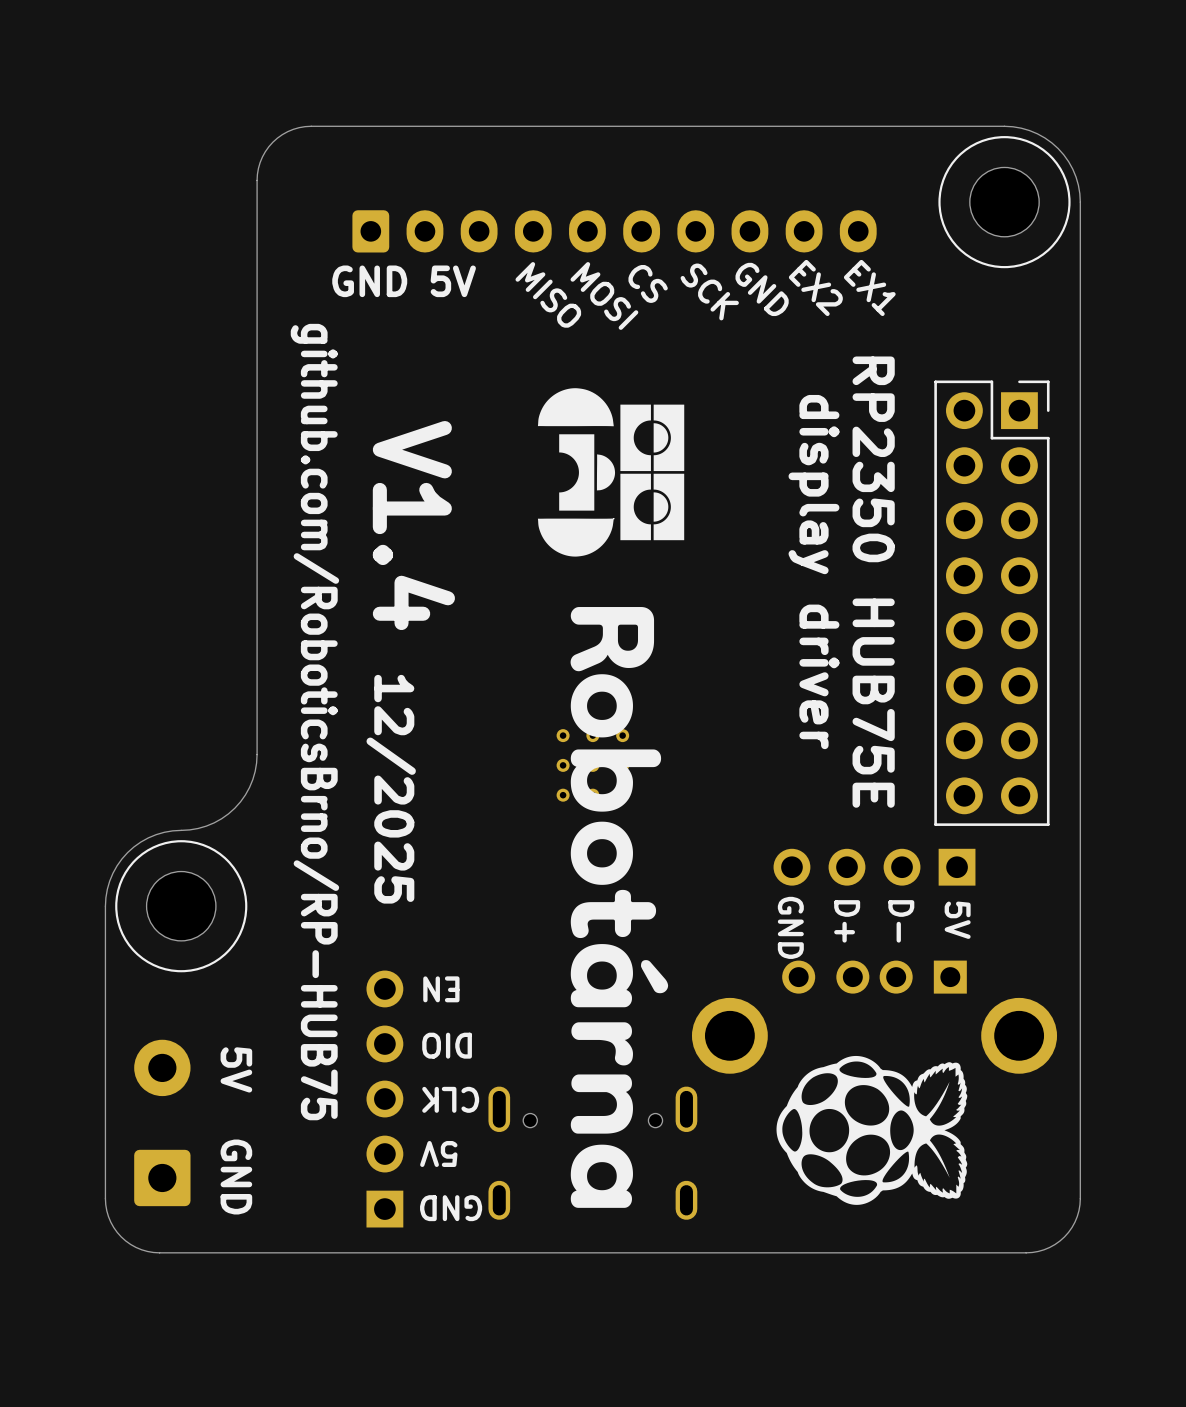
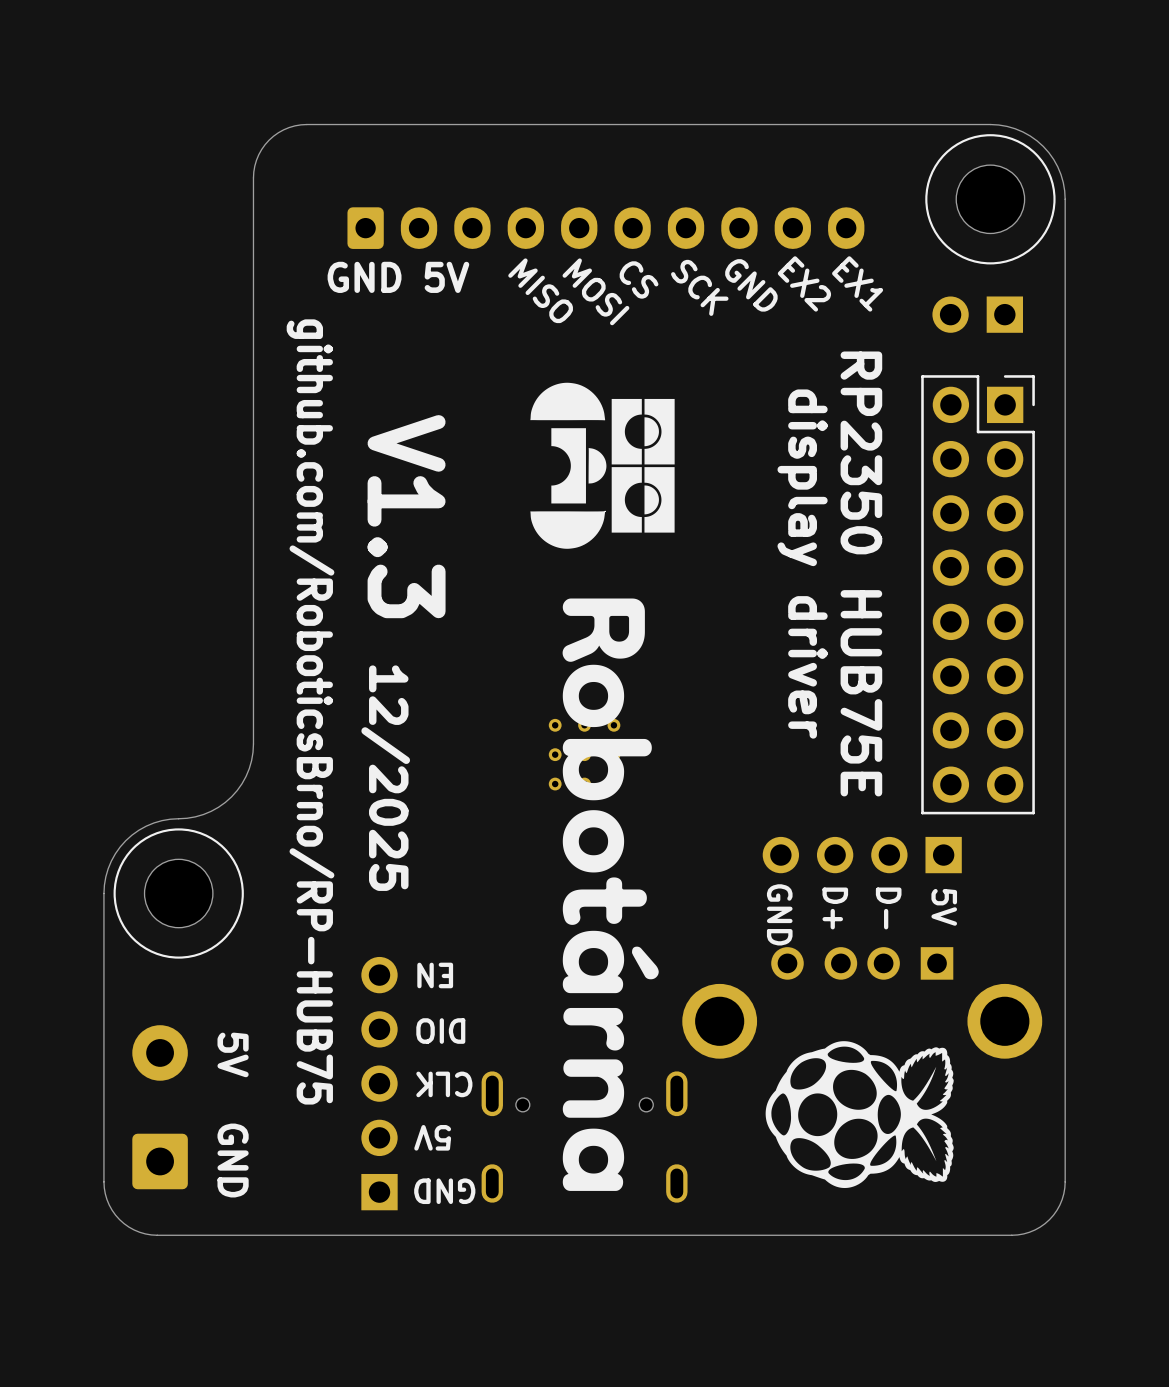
part: none -> (977, 314)
text: V1.4 (413, 525) -> V1.3 (406, 516)

